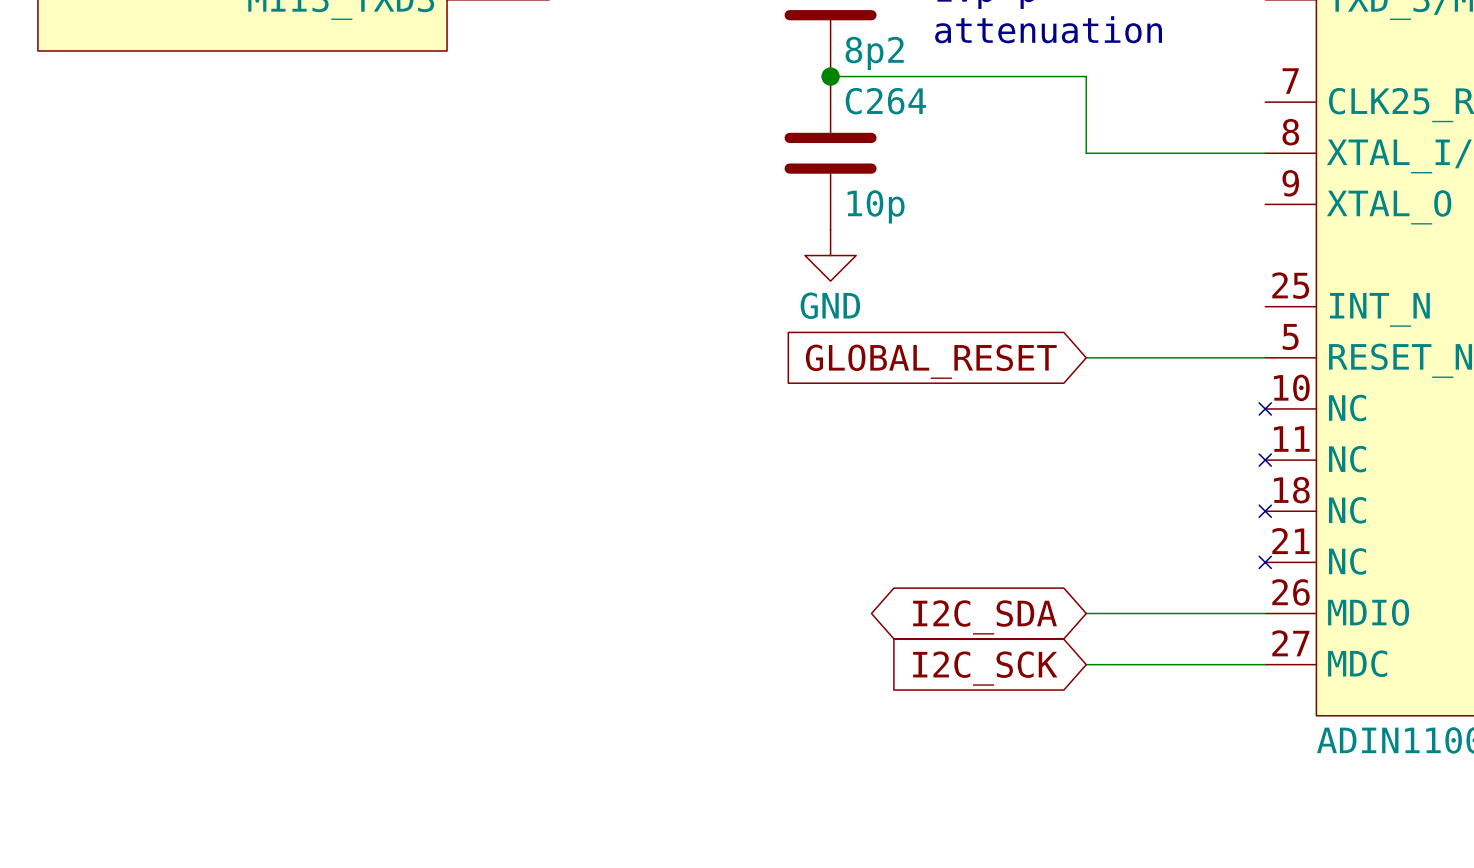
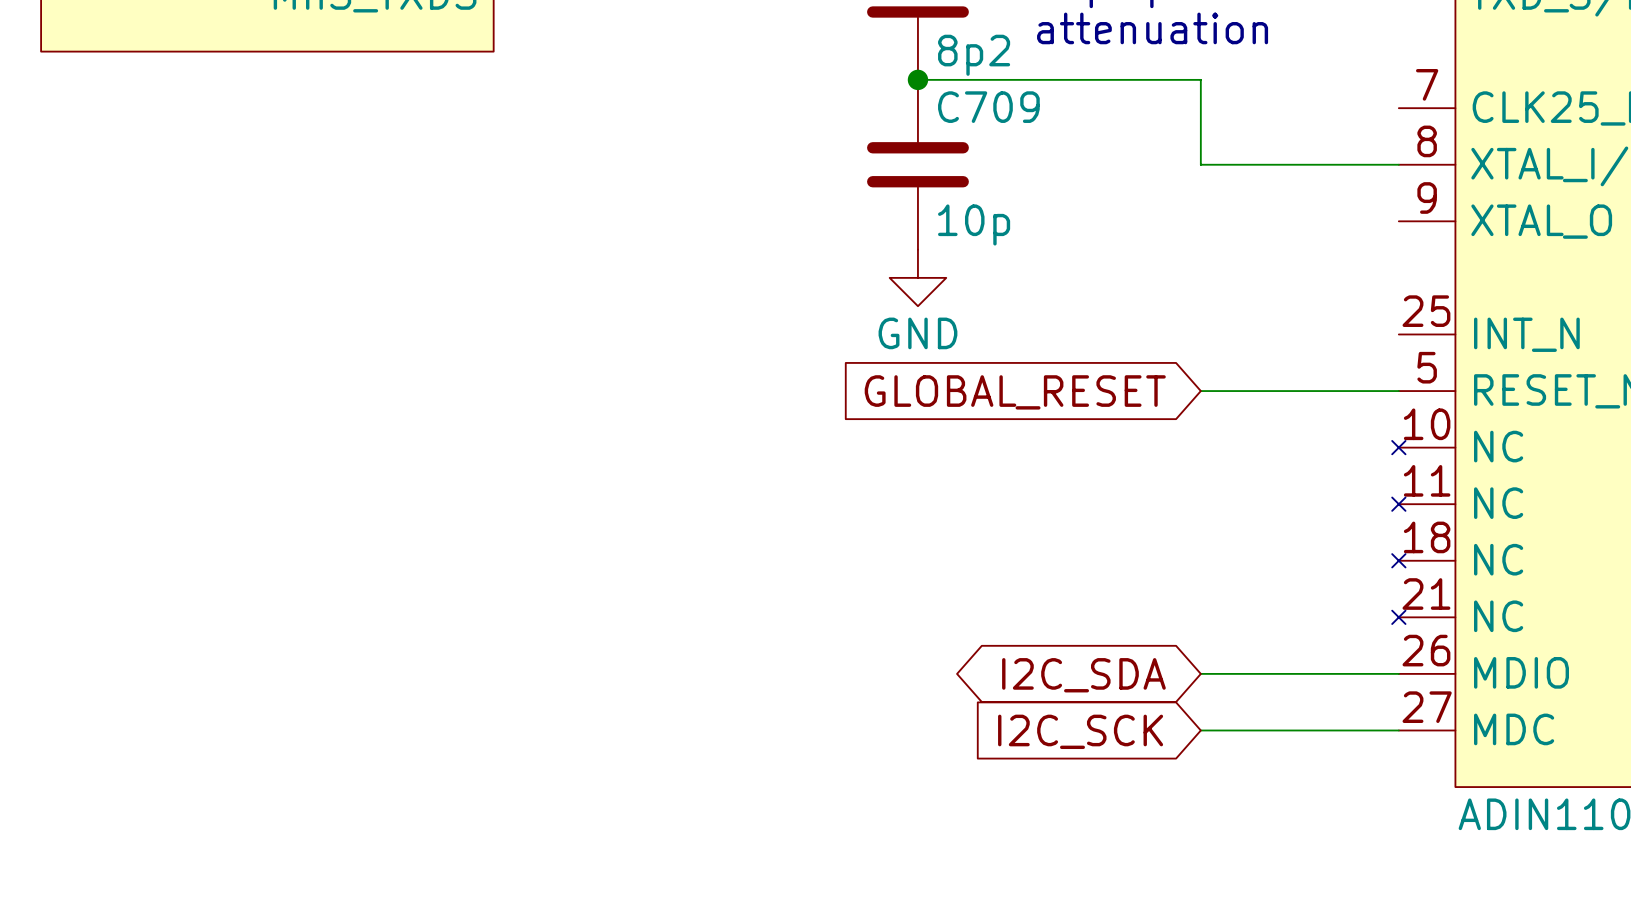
C264 name: C264 (885, 101) -> C709 (988, 107)

